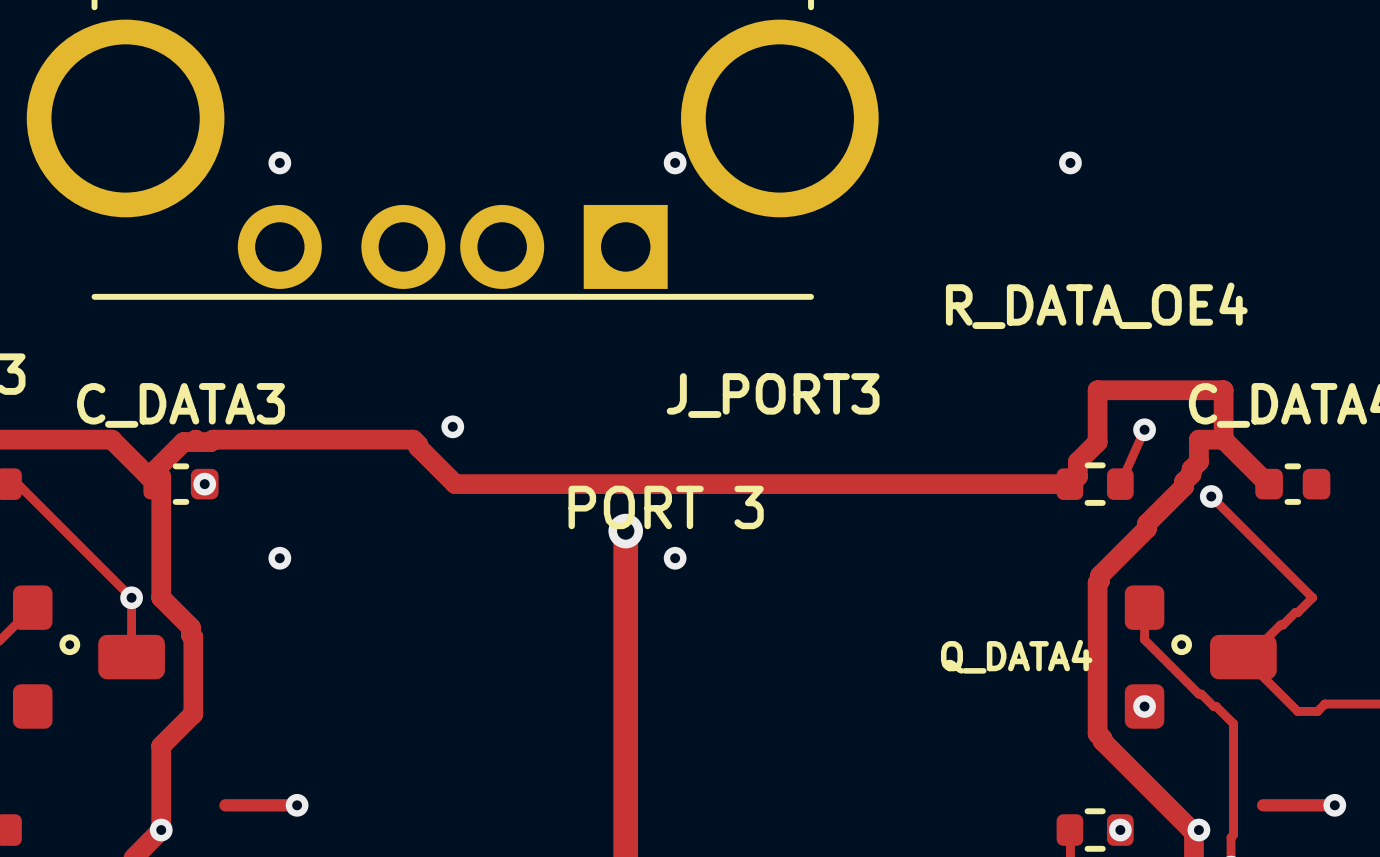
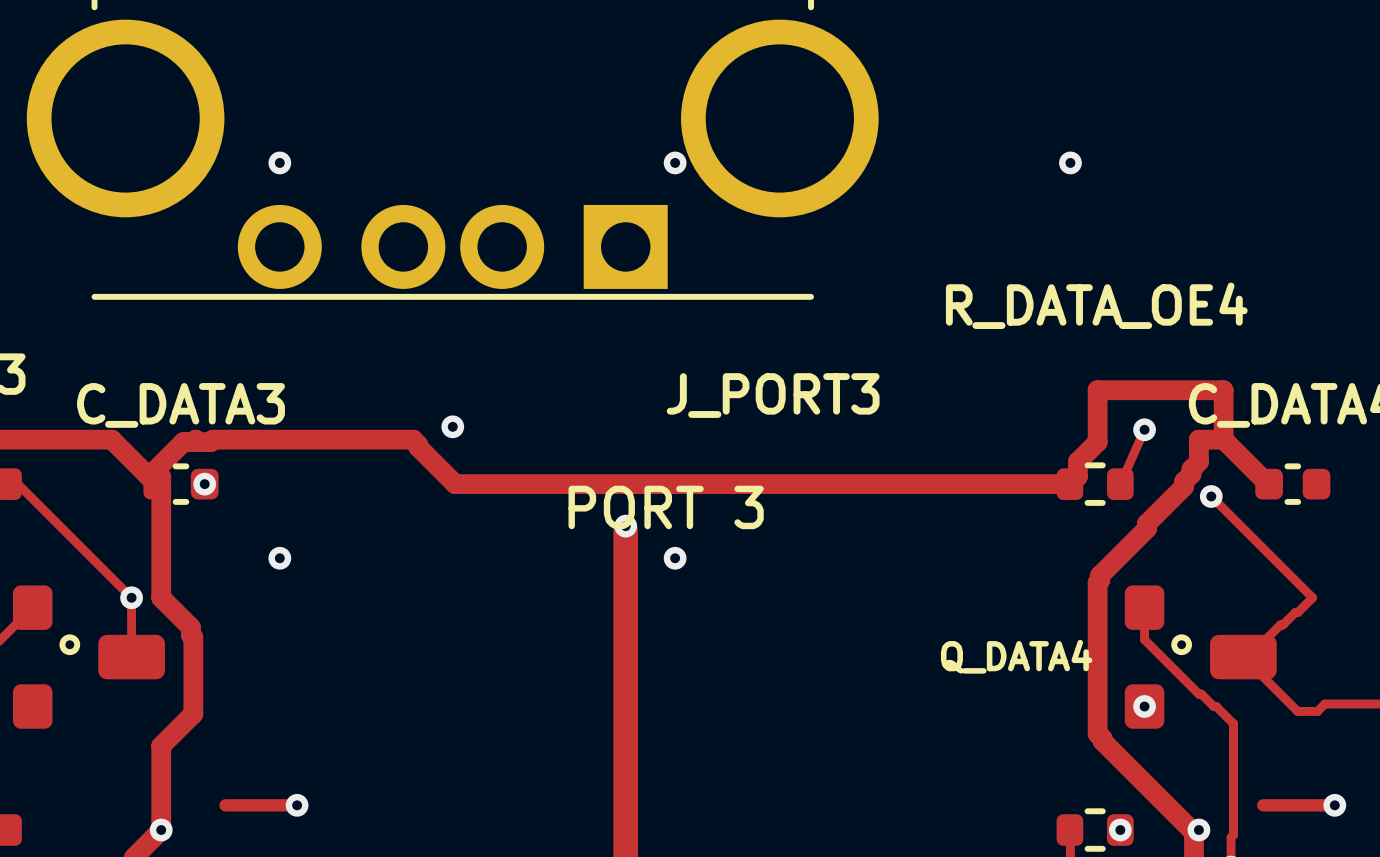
via size: [608, 513, 644, 549] -> [614, 514, 638, 538]

